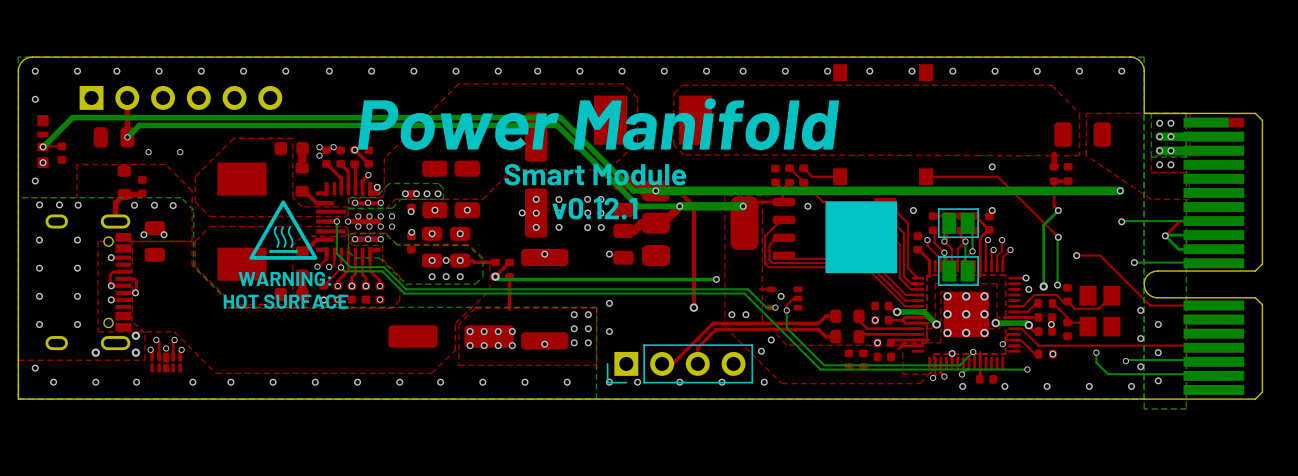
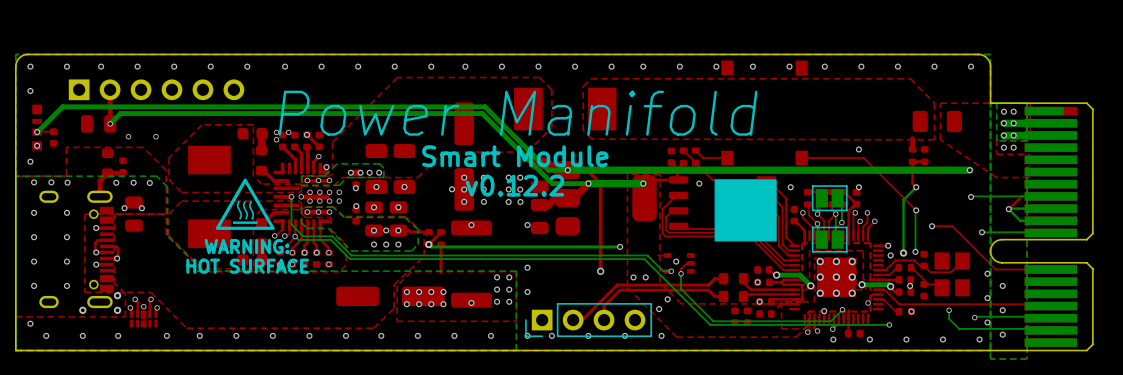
text: v0.12.1 (594, 208) -> v0.12.2 (514, 185)

